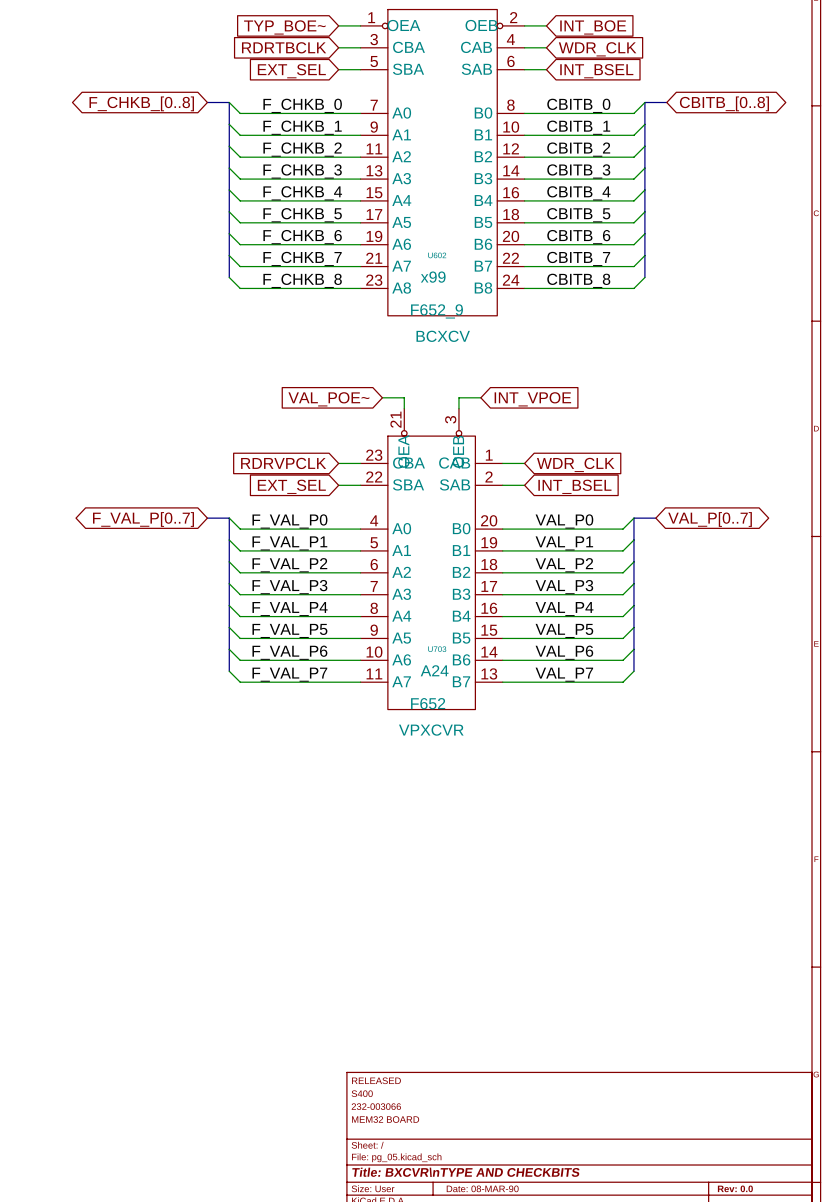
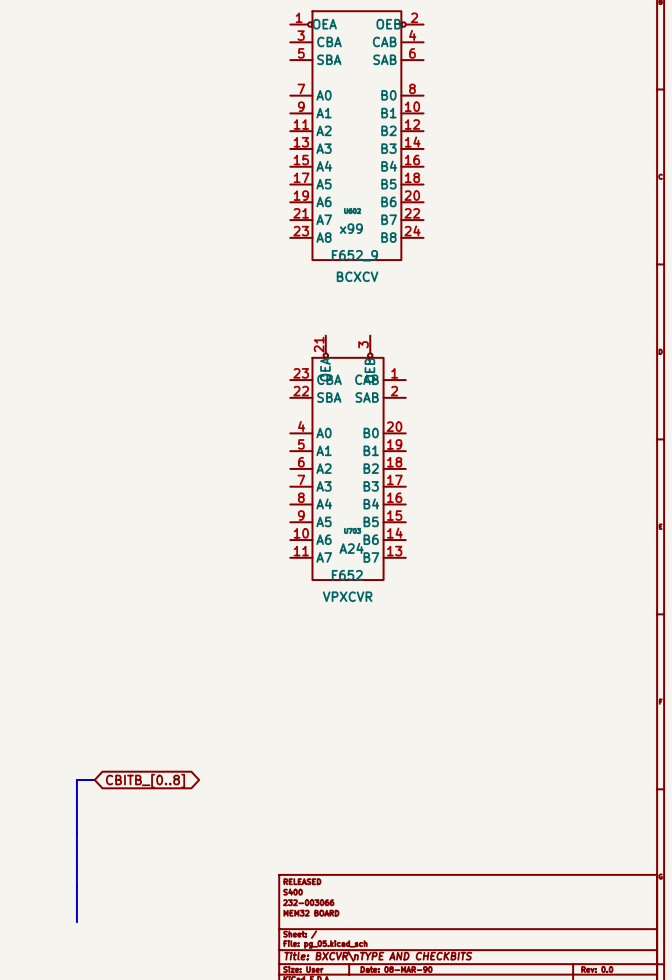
wire: (338, 25) (360, 25) -> none
wire: (524, 25) (546, 25) -> none
global label: TYP_BOE~ (284, 27) -> none
global label: INT_BOE (593, 27) -> none
global label: RDRTBCLK (284, 47) -> none
wire: (338, 47) (360, 47) -> none
wire: (524, 47) (546, 47) -> none
global label: WDR_CLK (597, 49) -> none
wire: (338, 69) (360, 69) -> none
wire: (524, 69) (546, 69) -> none
global label: EXT_SEL (291, 71) -> none
global label: INT_BSEL (596, 71) -> none
bus: (207, 102) (229, 102) (229, 277) -> none
wire: (229, 102) (240, 113) (360, 113) -> none
wire: (644, 102) (633, 113) (524, 113) -> none
bus: (666, 102) (644, 102) (644, 277) -> none
global label: F_CHKB_[0..8] (141, 103) -> none
global label: CBITB_[0..8] (724, 103) -> none
label: F_CHKB_0 (302, 105) -> none
label: CBITB_0 (578, 105) -> none
wire: (229, 124) (240, 135) (360, 135) -> none
wire: (644, 124) (633, 135) (524, 135) -> none
label: F_CHKB_1 (302, 127) -> none
label: CBITB_1 (578, 127) -> none
wire: (229, 146) (240, 157) (360, 157) -> none
wire: (644, 146) (633, 157) (524, 157) -> none
label: F_CHKB_2 (302, 149) -> none
label: CBITB_2 (578, 149) -> none
wire: (229, 168) (240, 179) (360, 179) -> none
wire: (644, 168) (633, 179) (524, 179) -> none
label: F_CHKB_3 (302, 171) -> none
label: CBITB_3 (578, 171) -> none
wire: (229, 190) (240, 200) (360, 200) -> none
wire: (644, 190) (633, 200) (524, 200) -> none
label: F_CHKB_4 (302, 193) -> none
label: CBITB_4 (578, 193) -> none
wire: (229, 211) (240, 222) (360, 222) -> none
wire: (644, 211) (633, 222) (524, 222) -> none
label: F_CHKB_5 (302, 215) -> none
label: CBITB_5 (578, 215) -> none
wire: (229, 233) (240, 244) (360, 244) -> none
wire: (644, 233) (633, 244) (524, 244) -> none
label: F_CHKB_6 (302, 237) -> none
label: CBITB_6 (578, 237) -> none
wire: (229, 255) (240, 266) (360, 266) -> none
wire: (644, 255) (633, 266) (524, 266) -> none
label: F_CHKB_7 (302, 258) -> none
label: CBITB_7 (578, 258) -> none
wire: (229, 277) (240, 288) (360, 288) -> none
wire: (644, 277) (633, 288) (524, 288) -> none
label: F_CHKB_8 (302, 280) -> none
label: CBITB_8 (578, 280) -> none
wire: (382, 397) (404, 397) (404, 408) -> none
wire: (480, 397) (458, 397) (458, 408) -> none
global label: VAL_POE~ (328, 399) -> none
global label: INT_VPOE (532, 399) -> none
global label: RDRVPCLK (283, 463) -> none
wire: (338, 463) (360, 463) -> none
wire: (502, 463) (524, 463) -> none
global label: WDR_CLK (575, 464) -> none
wire: (338, 485) (360, 485) -> none
wire: (502, 485) (524, 485) -> none
global label: EXT_SEL (291, 486) -> none
global label: INT_BSEL (574, 486) -> none
bus: (207, 518) (229, 518) (229, 671) -> none
wire: (229, 518) (240, 529) (360, 529) -> none
wire: (633, 518) (623, 529) (502, 529) -> none
bus: (655, 518) (633, 518) (633, 671) -> none
global label: F_VAL_P[0..7] (143, 519) -> none
global label: VAL_P[0..7] (710, 519) -> none
label: F_VAL_P0 (289, 521) -> none
label: VAL_P0 (564, 521) -> none
wire: (229, 540) (240, 550) (360, 550) -> none
wire: (633, 540) (623, 550) (502, 550) -> none
label: F_VAL_P1 (289, 543) -> none
label: VAL_P1 (564, 543) -> none
wire: (229, 561) (240, 572) (360, 572) -> none
wire: (633, 561) (623, 572) (502, 572) -> none
label: F_VAL_P2 (289, 565) -> none
label: VAL_P2 (564, 565) -> none
wire: (229, 583) (240, 594) (360, 594) -> none
wire: (633, 583) (623, 594) (502, 594) -> none
label: F_VAL_P3 (289, 587) -> none
label: VAL_P3 (564, 587) -> none
wire: (229, 605) (240, 616) (360, 616) -> none
wire: (633, 605) (623, 616) (502, 616) -> none
label: F_VAL_P4 (290, 609) -> none
label: VAL_P4 (564, 609) -> none
wire: (229, 627) (240, 638) (360, 638) -> none
wire: (633, 627) (623, 638) (502, 638) -> none
label: F_VAL_P5 (289, 630) -> none
label: VAL_P5 (564, 630) -> none
wire: (229, 649) (240, 660) (360, 660) -> none
wire: (633, 649) (623, 660) (502, 660) -> none
label: F_VAL_P6 (289, 652) -> none
label: VAL_P6 (564, 652) -> none
wire: (229, 671) (240, 682) (360, 682) -> none
wire: (633, 671) (623, 682) (502, 682) -> none
label: F_VAL_P7 (289, 674) -> none
label: VAL_P7 (564, 674) -> none
bus: none -> (94, 780) (76, 780) (76, 922)
global label: none -> CBITB_[0..8] (145, 781)

